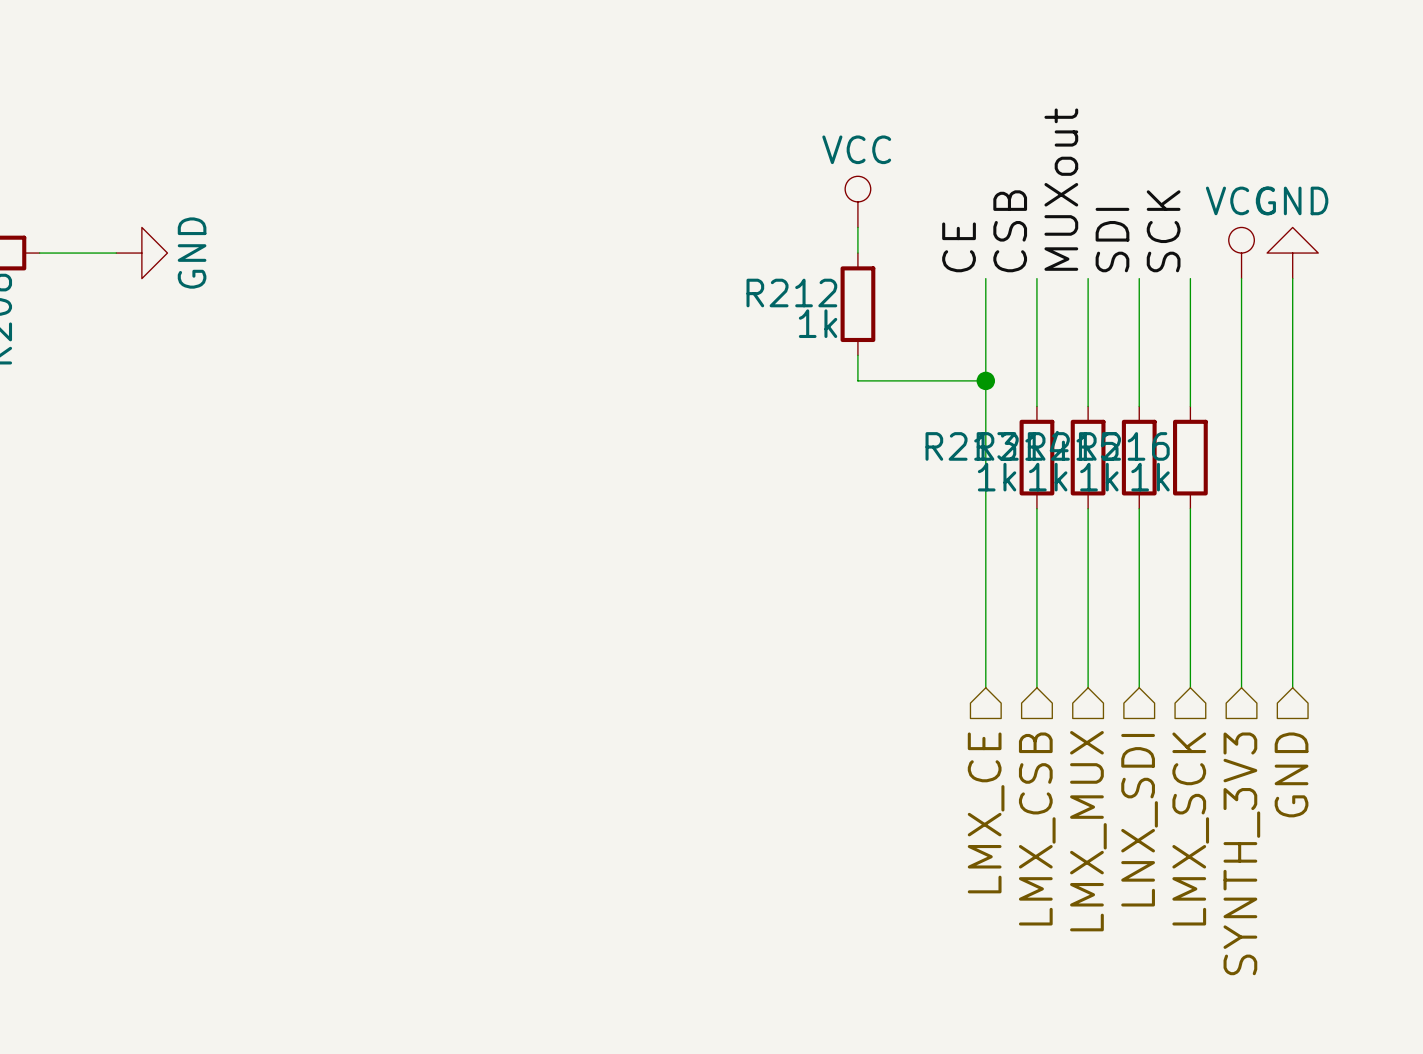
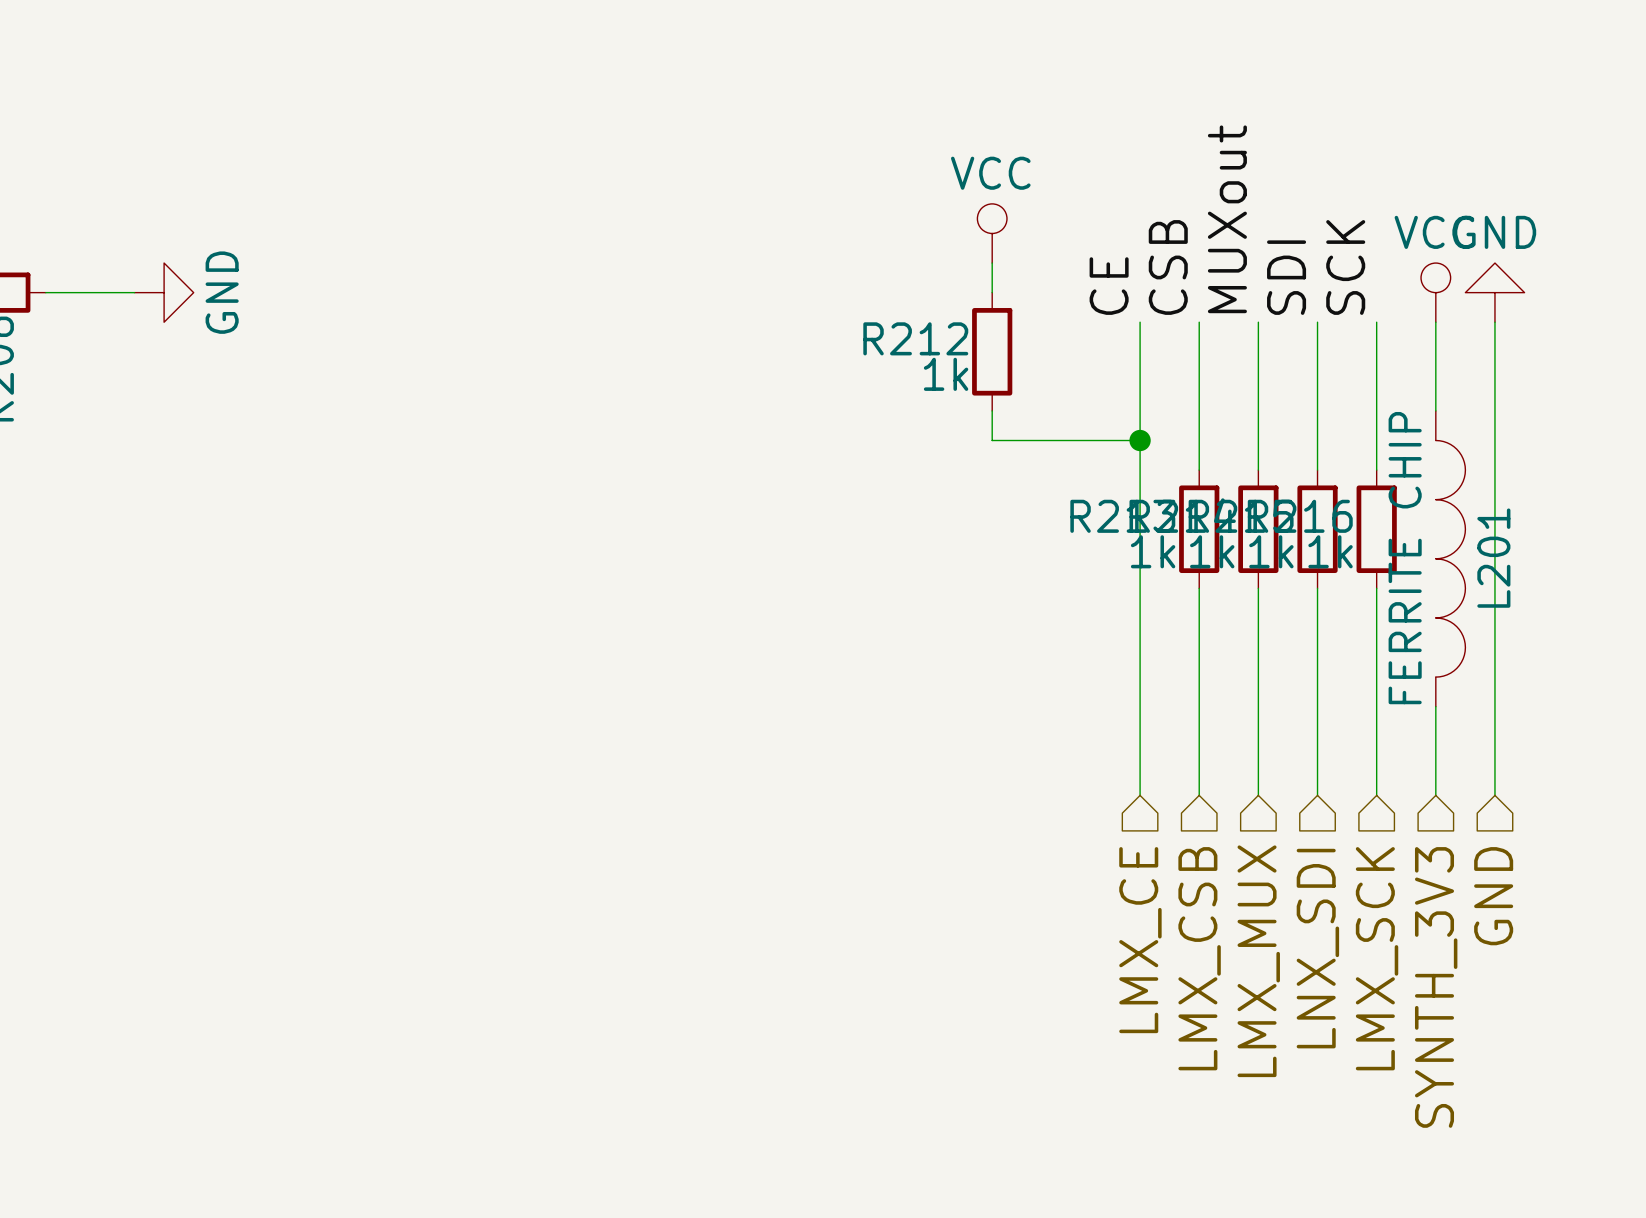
wire: (1241, 355) (1241, 611) -> none
L201: none -> FERRITE CHIP (1450, 558)

